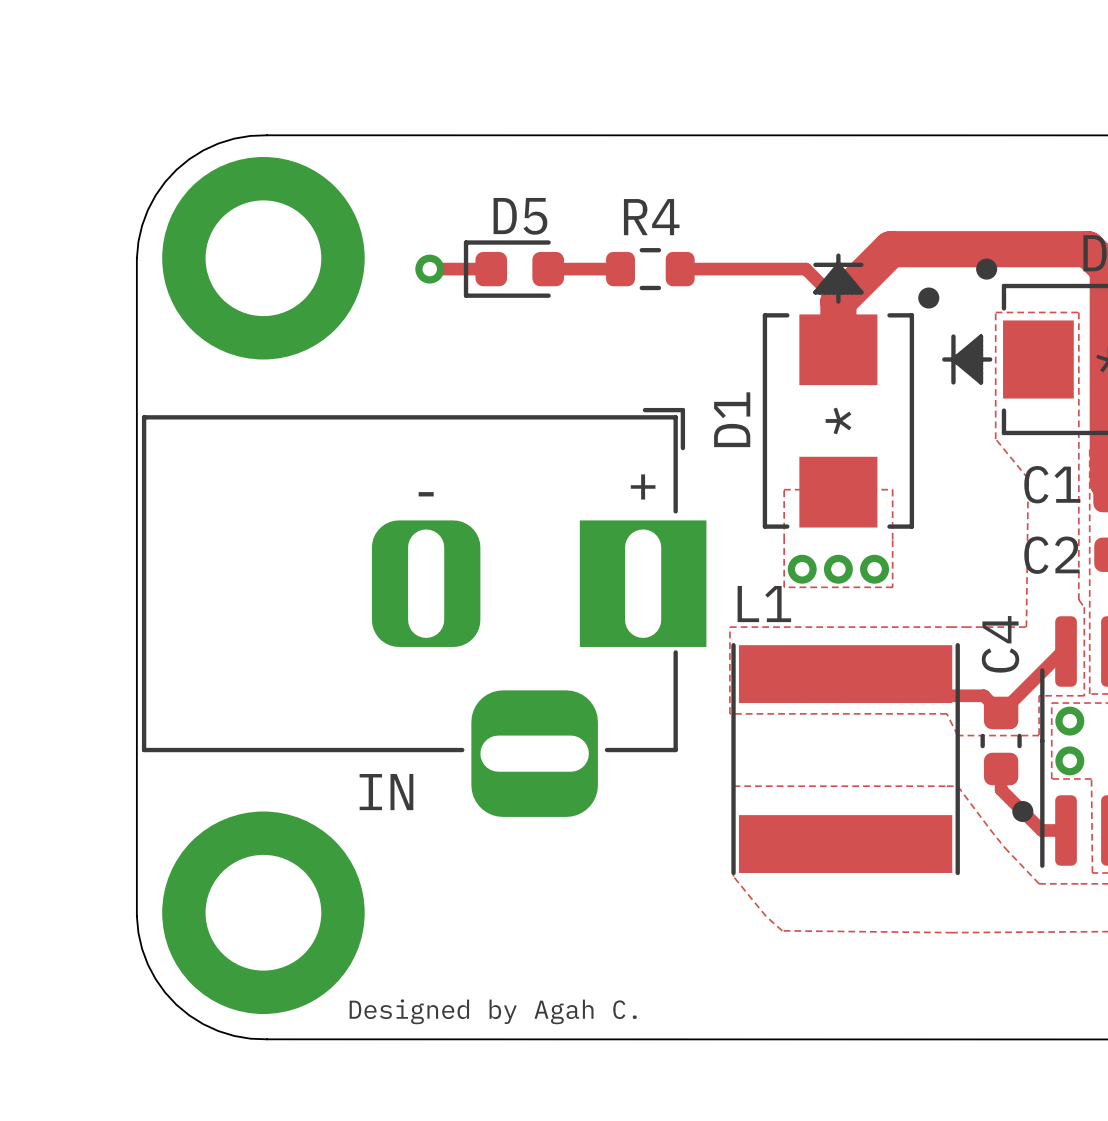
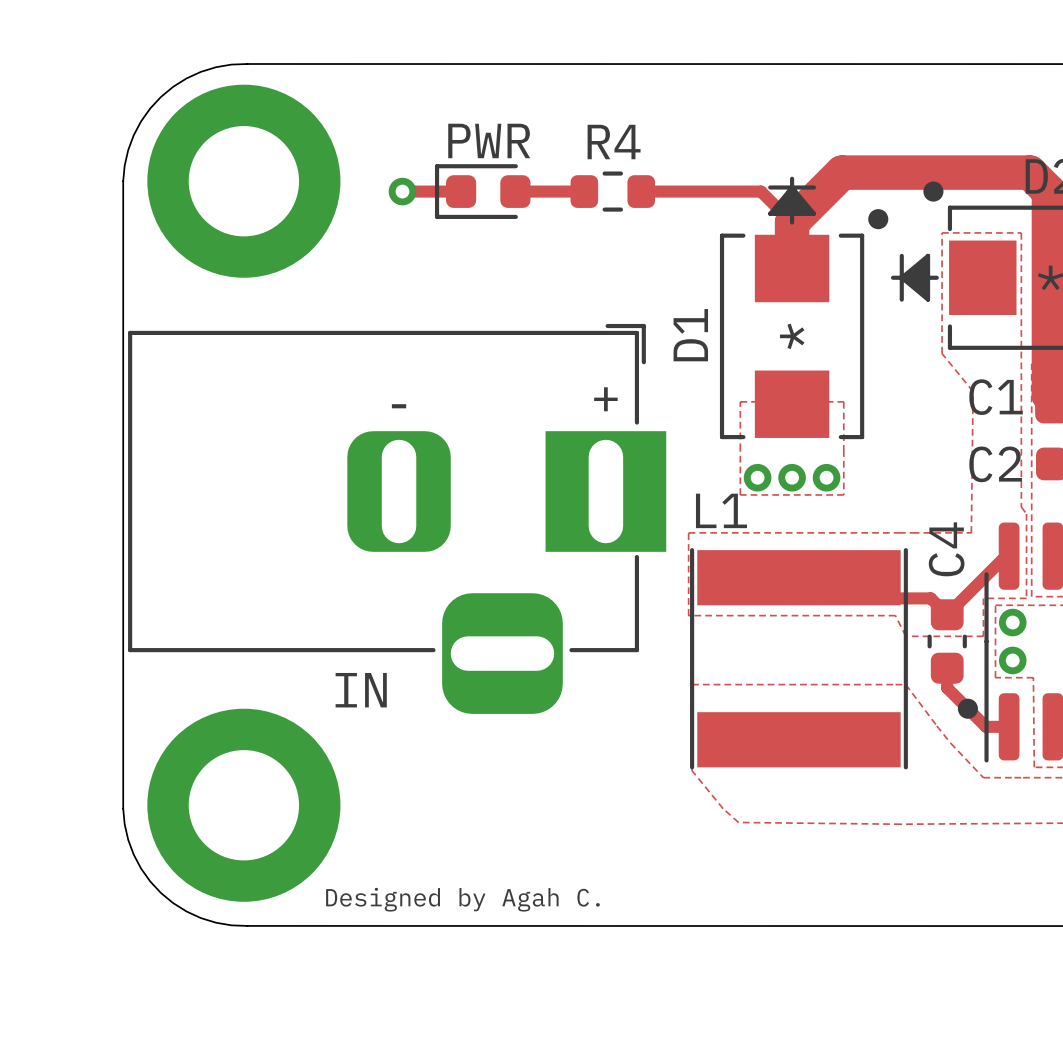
D5 name: D5 (520, 216) -> PWR (489, 140)

